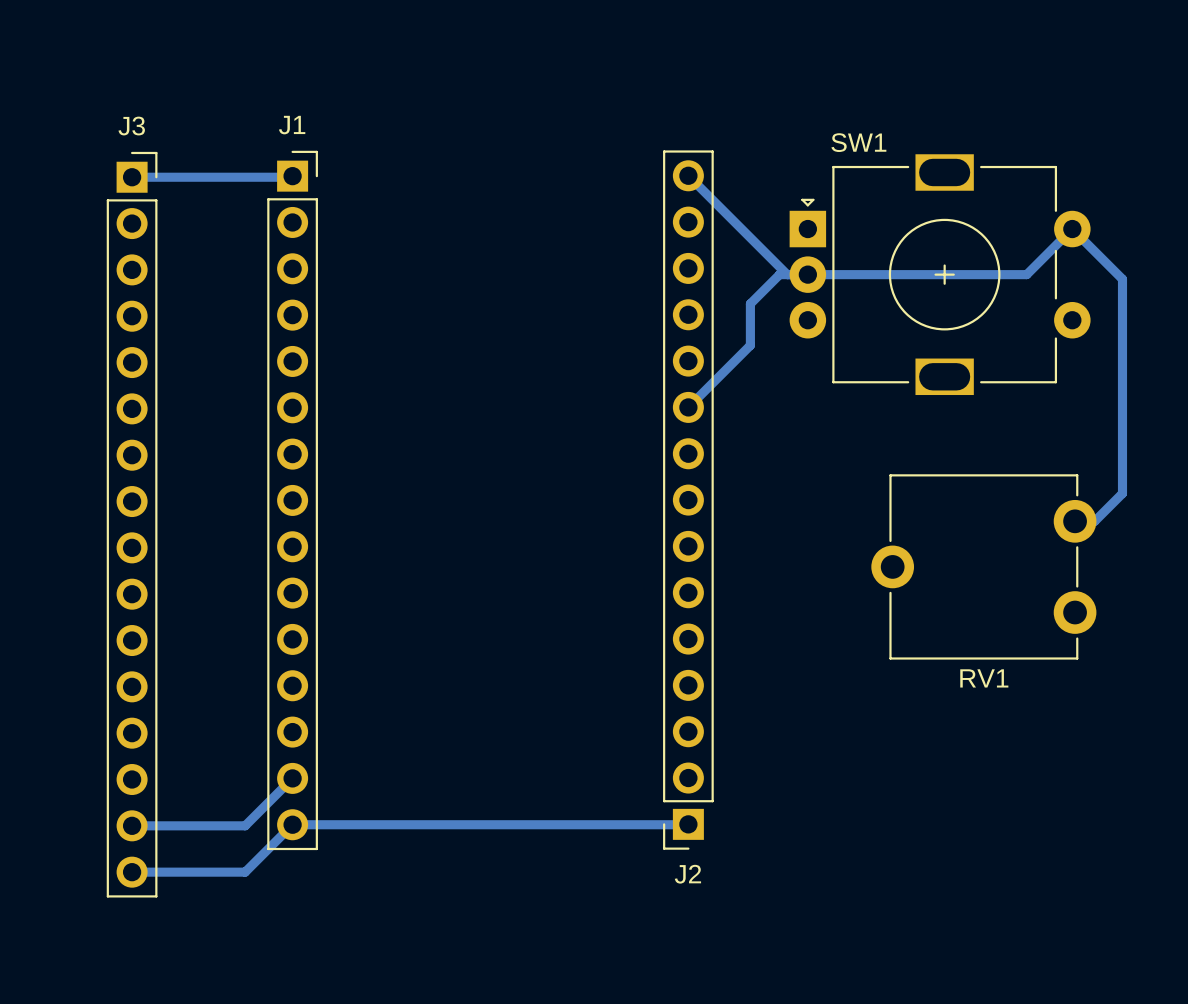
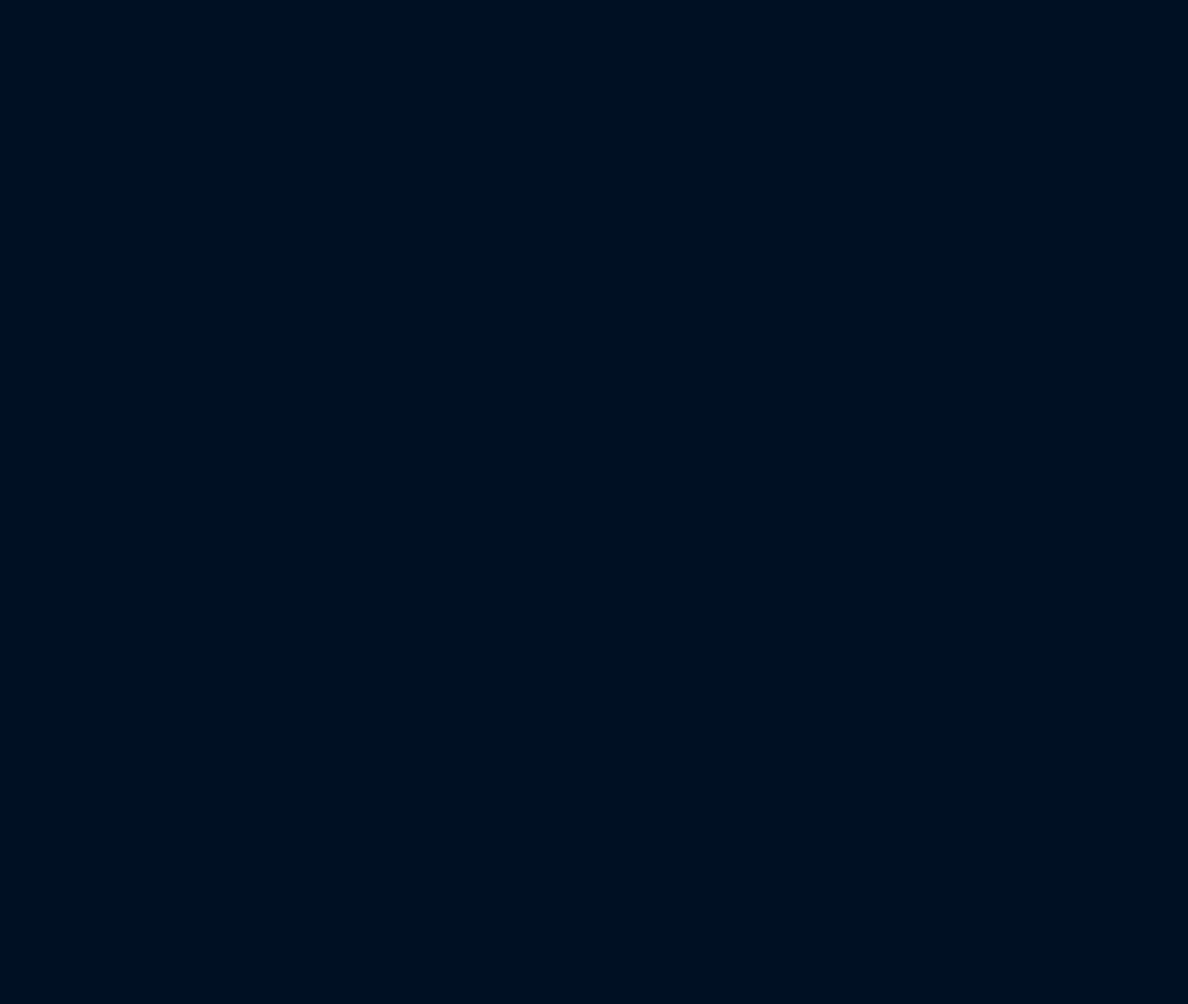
bottom track: (688, 175) (787, 274) -> none
bottom track: (292, 176) (132, 177) -> none
SW1: (940, 274) -> none
bottom track: (688, 407) (750, 345) (750, 303) (779, 274) (1026, 274) (1072, 229) (1122, 279) (1122, 493) (1094, 521) (1075, 521) -> none
J1: (292, 500) -> none
J2: (688, 500) -> none
J3: (132, 524) -> none
RV1: (983, 566) -> none
bottom track: (292, 778) (245, 825) (132, 825) -> none
bottom track: (688, 824) (292, 824) (245, 872) (132, 872) -> none

